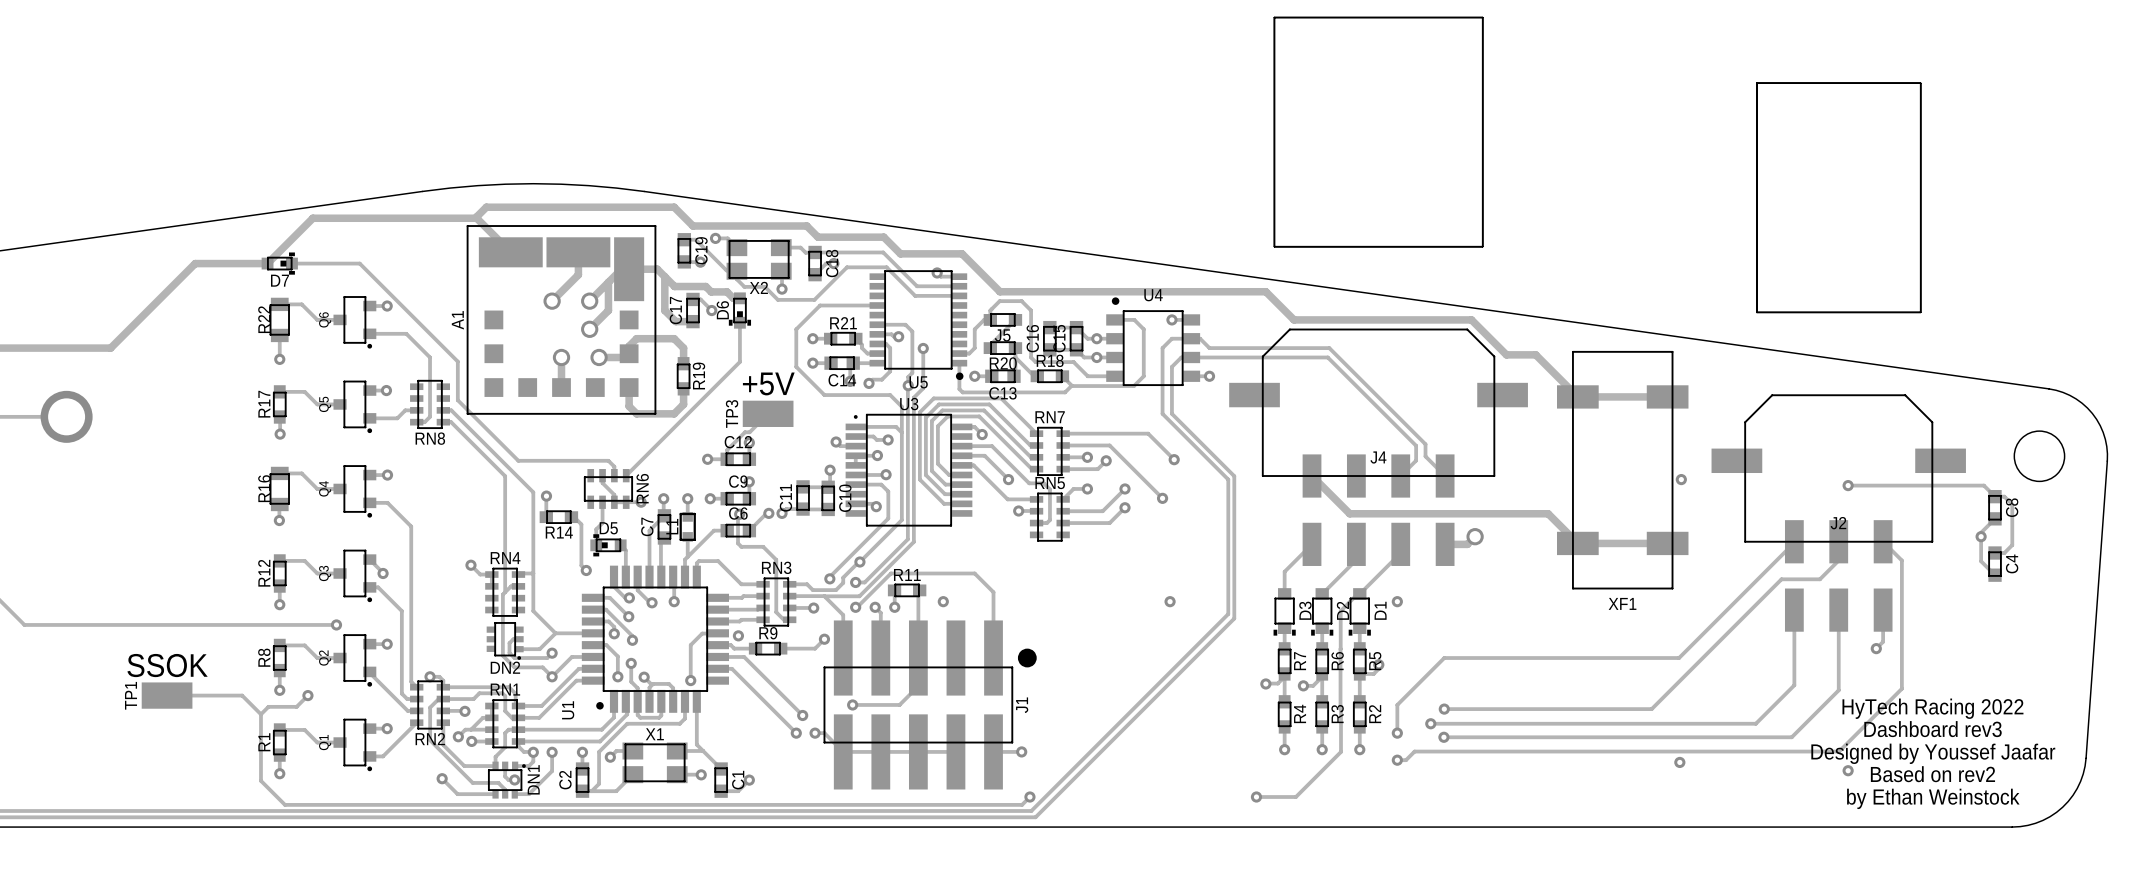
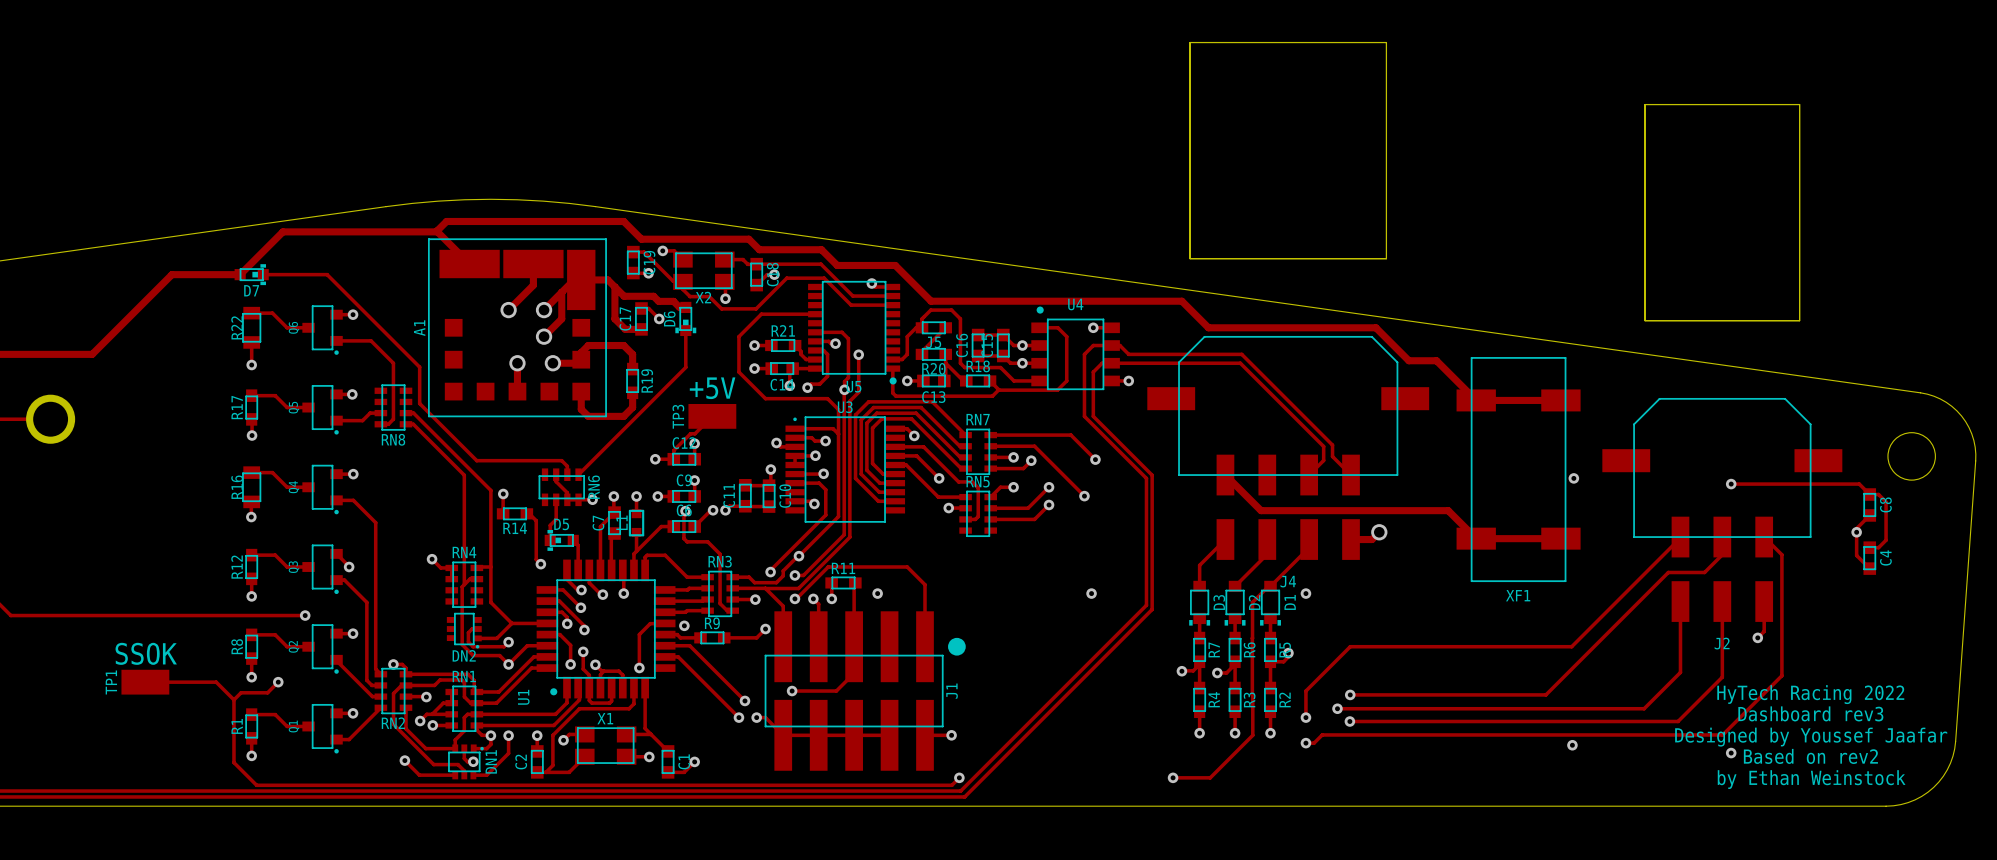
J4 name position: J4 (1378, 457) -> J4 (1288, 581)
J2 name position: J2 (1838, 523) -> J2 (1722, 643)

